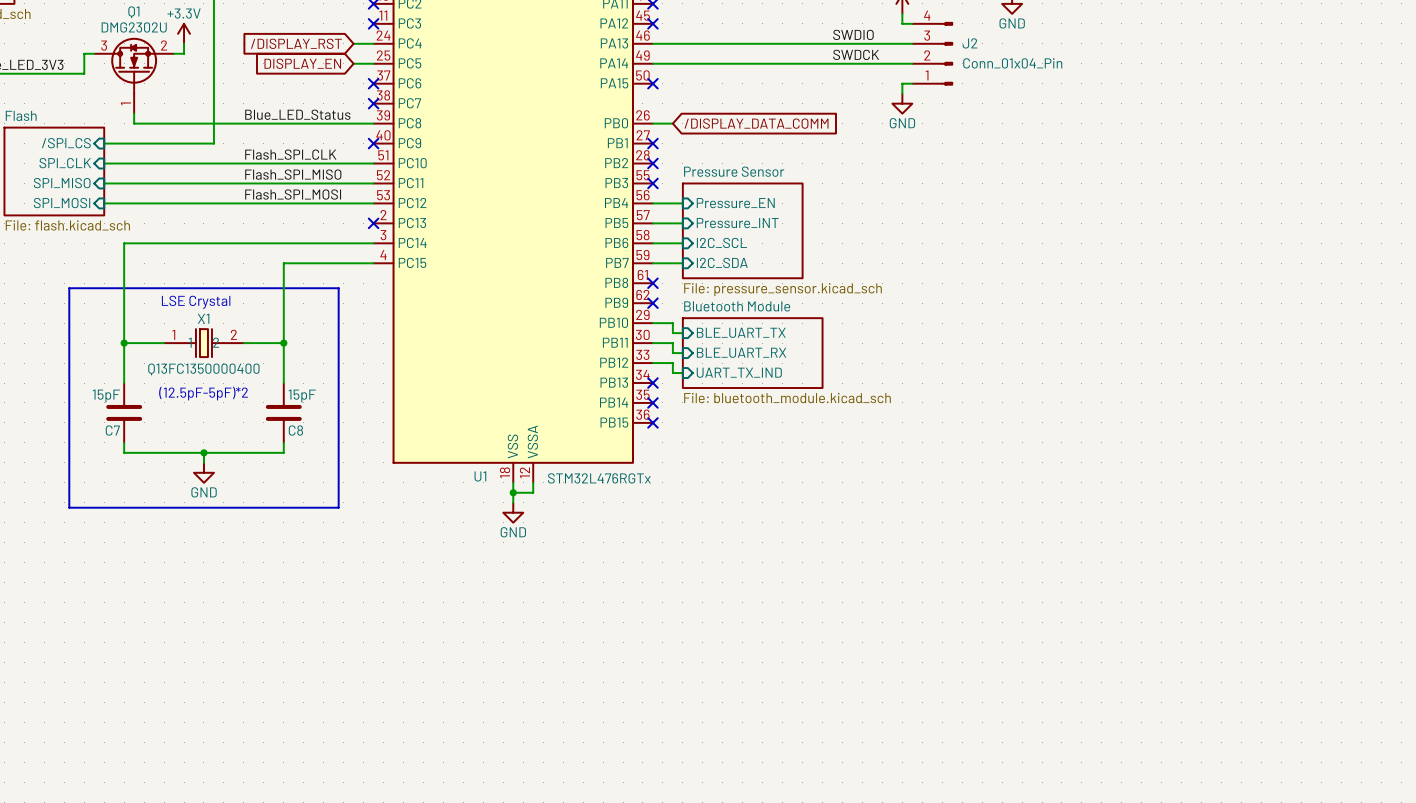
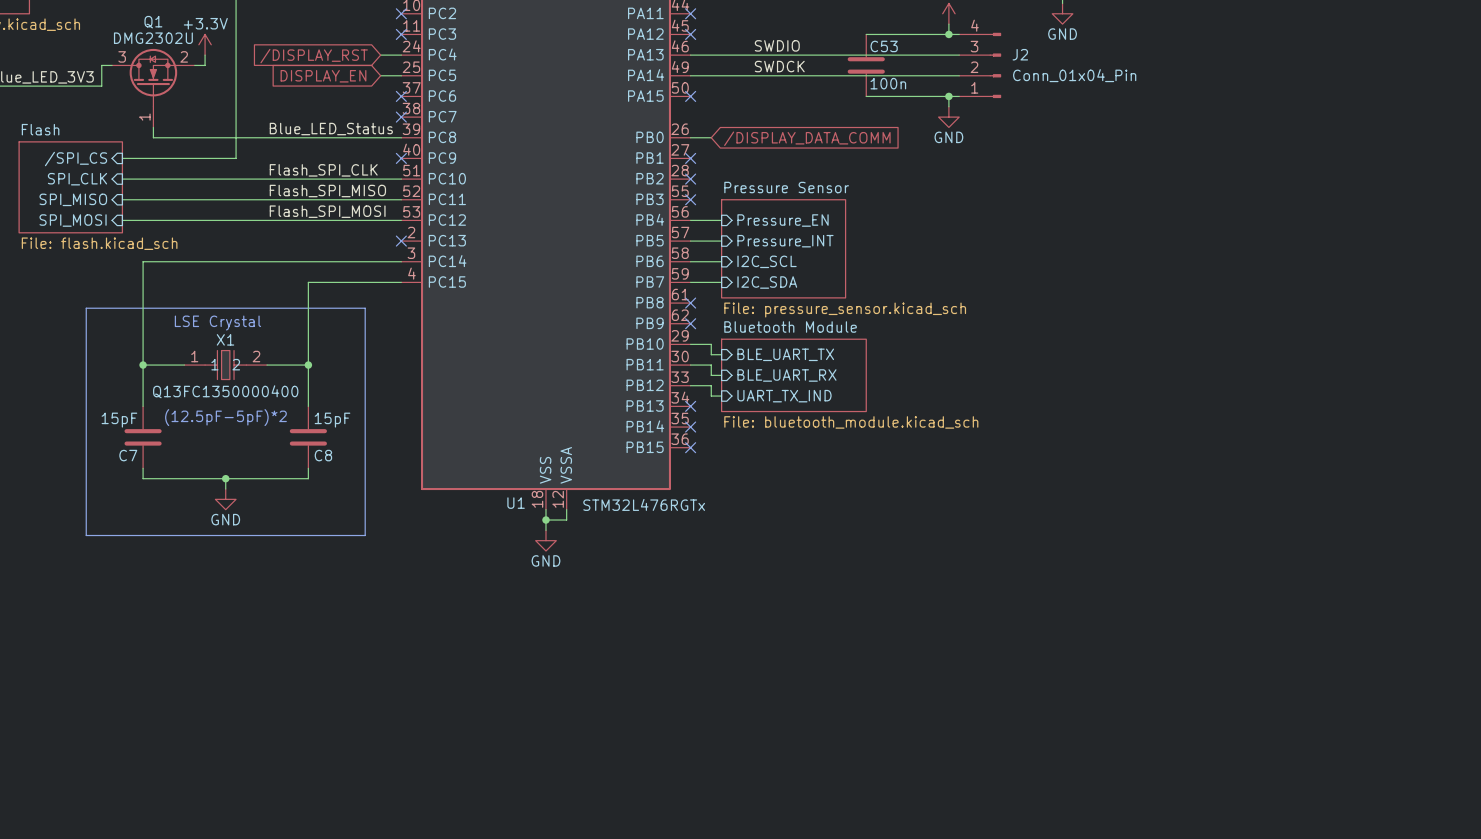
wire: none -> (866, 34) (948, 34)
junction: none -> (948, 34)
label position: SWDIO (853, 34) -> SWDIO (777, 45)
C53: none -> 100n (866, 65)
label position: SWDCK (856, 54) -> SWDCK (779, 66)
wire: none -> (866, 96) (948, 96)
junction: none -> (948, 96)

